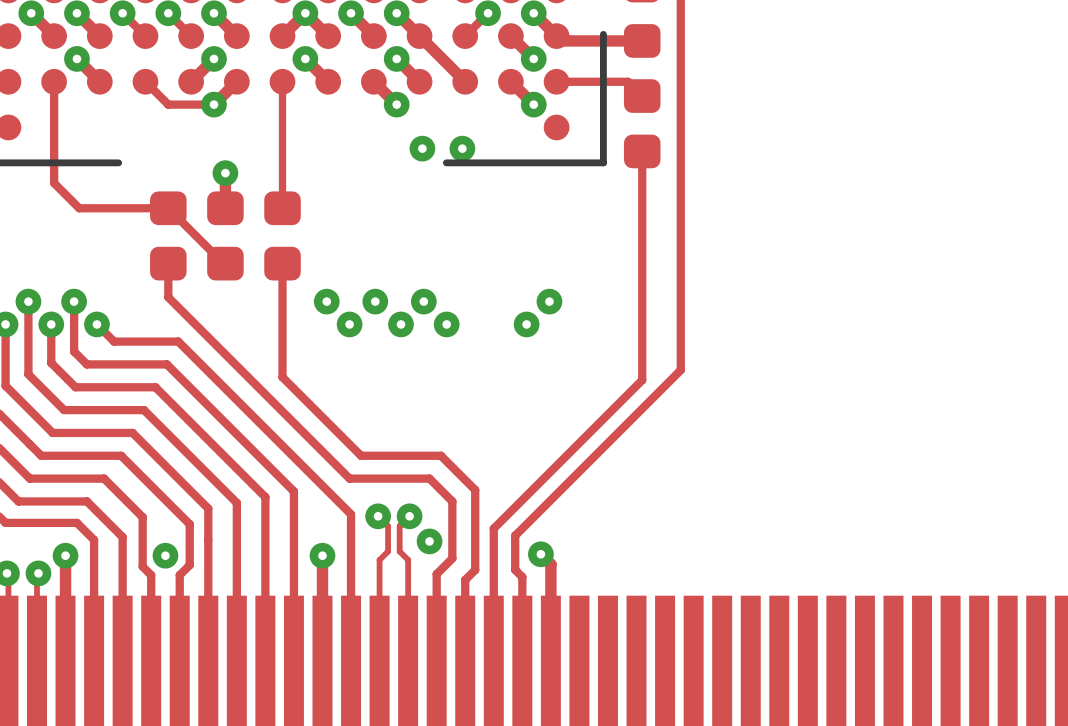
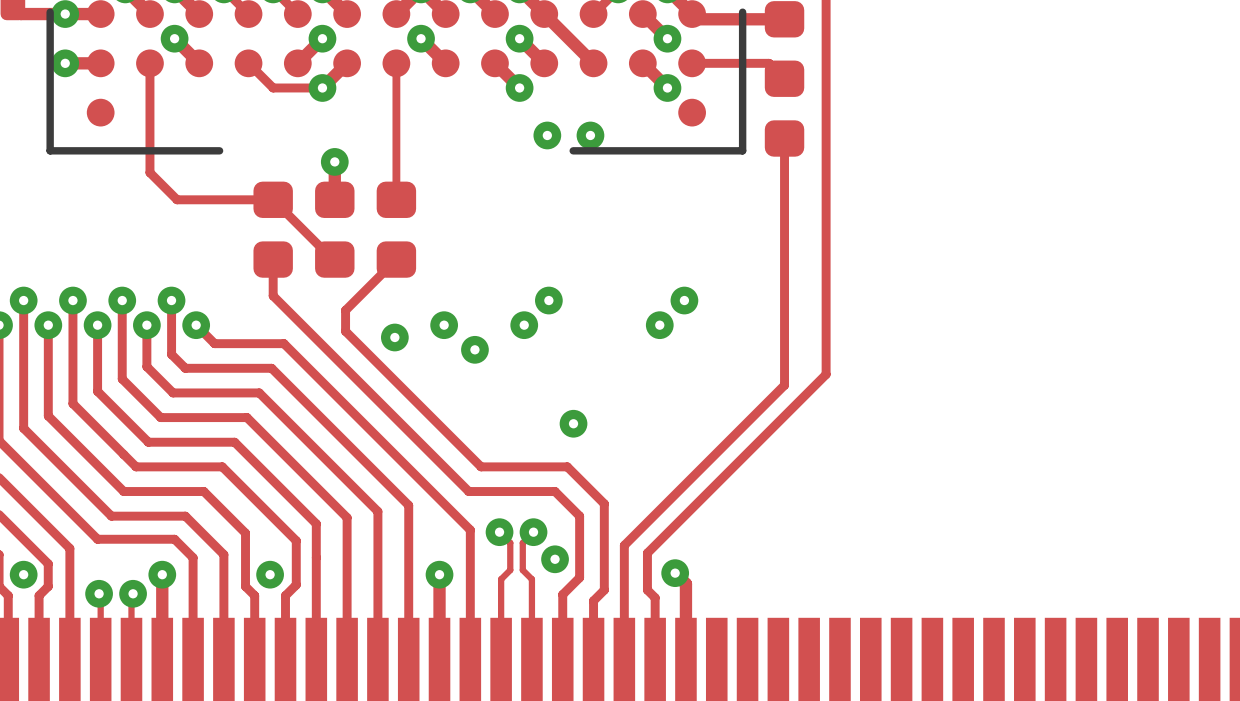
track: (282, 263) (282, 377) -> (396, 259) (345, 310) (345, 331) (396, 382)
via: (326, 301) -> none
via: (375, 301) -> none
via: none -> (444, 325)
via: (349, 324) -> none
via: (446, 324) -> none
via: none -> (394, 337)
via: none -> (474, 349)
via: none -> (573, 423)

